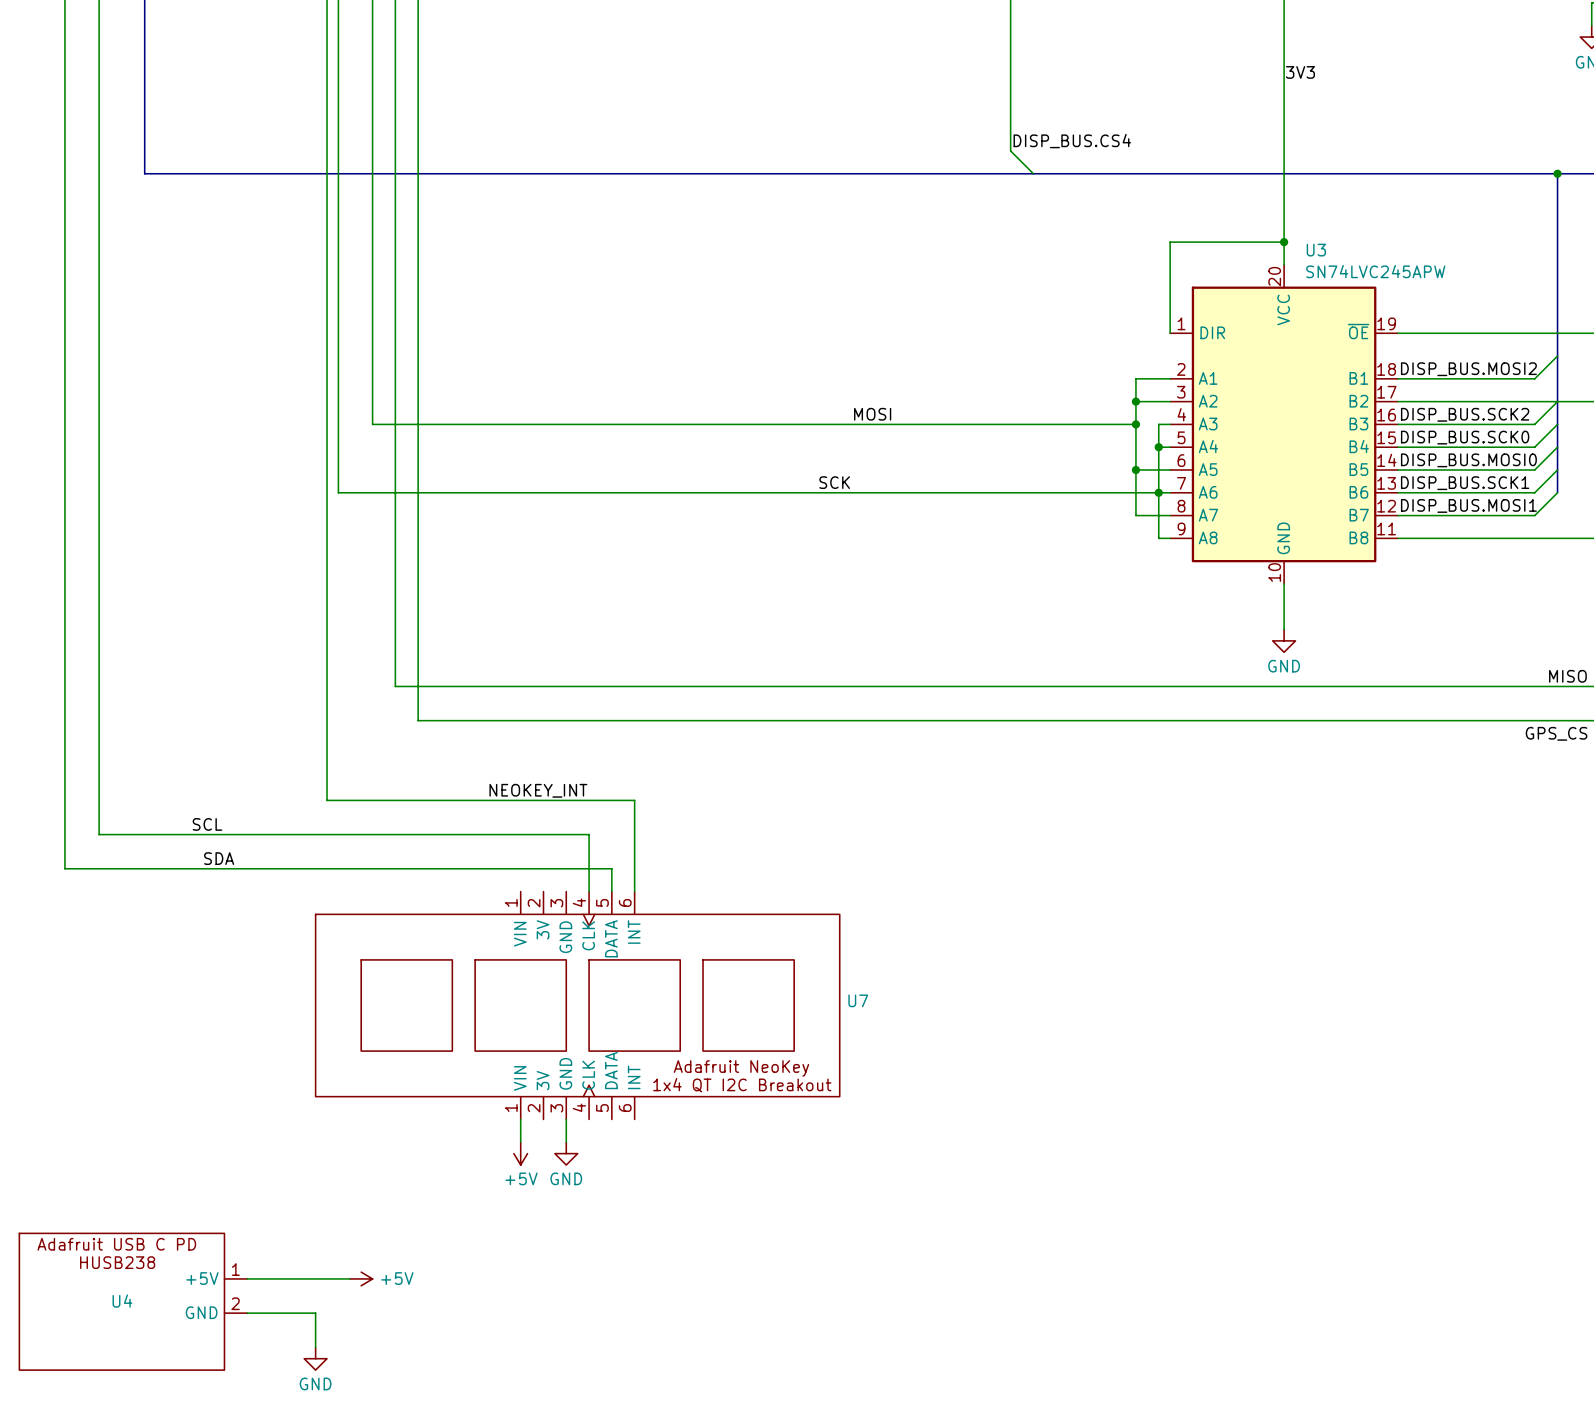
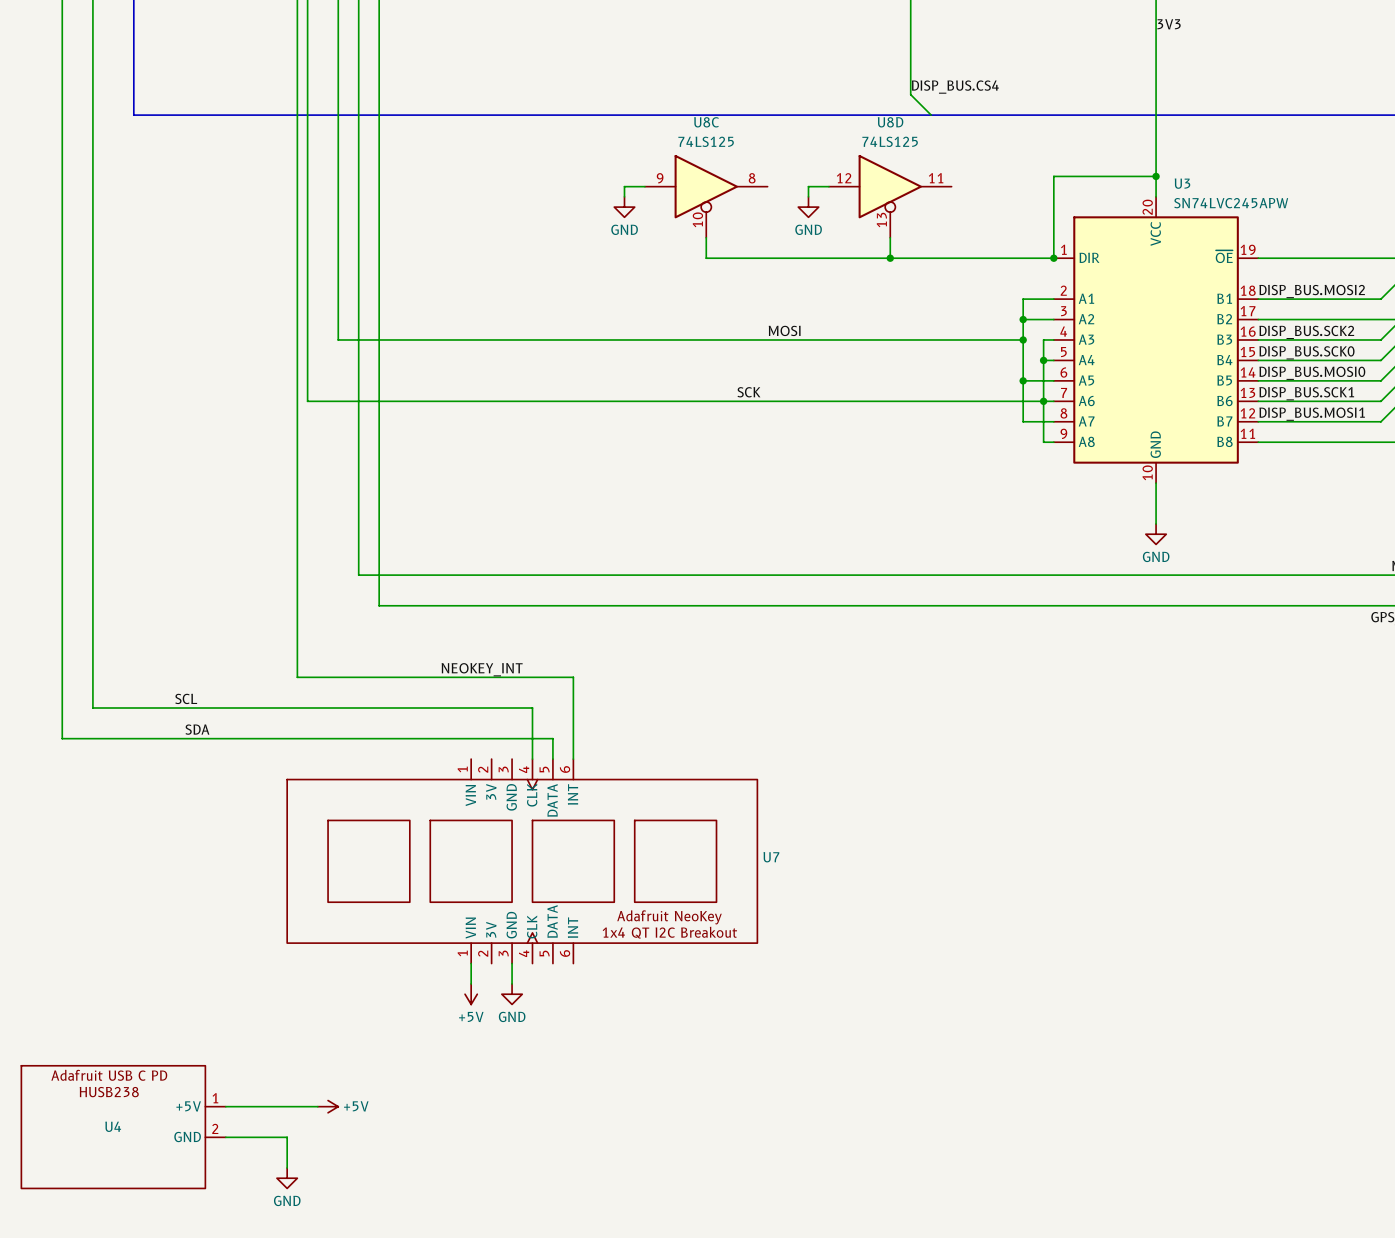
wire: none -> (644, 186) (624, 186) (624, 196)
wire: none -> (828, 186) (808, 186) (808, 196)
U8C: none -> 74LS125 (706, 196)
U8D: none -> 74LS125 (890, 196)
power symbol: none -> GND (624, 207)
power symbol: none -> GND (808, 207)
wire: none -> (706, 237) (706, 258) (1053, 258)
wire: none -> (890, 237) (890, 258)
junction: none -> (890, 258)
junction: none -> (1053, 258)

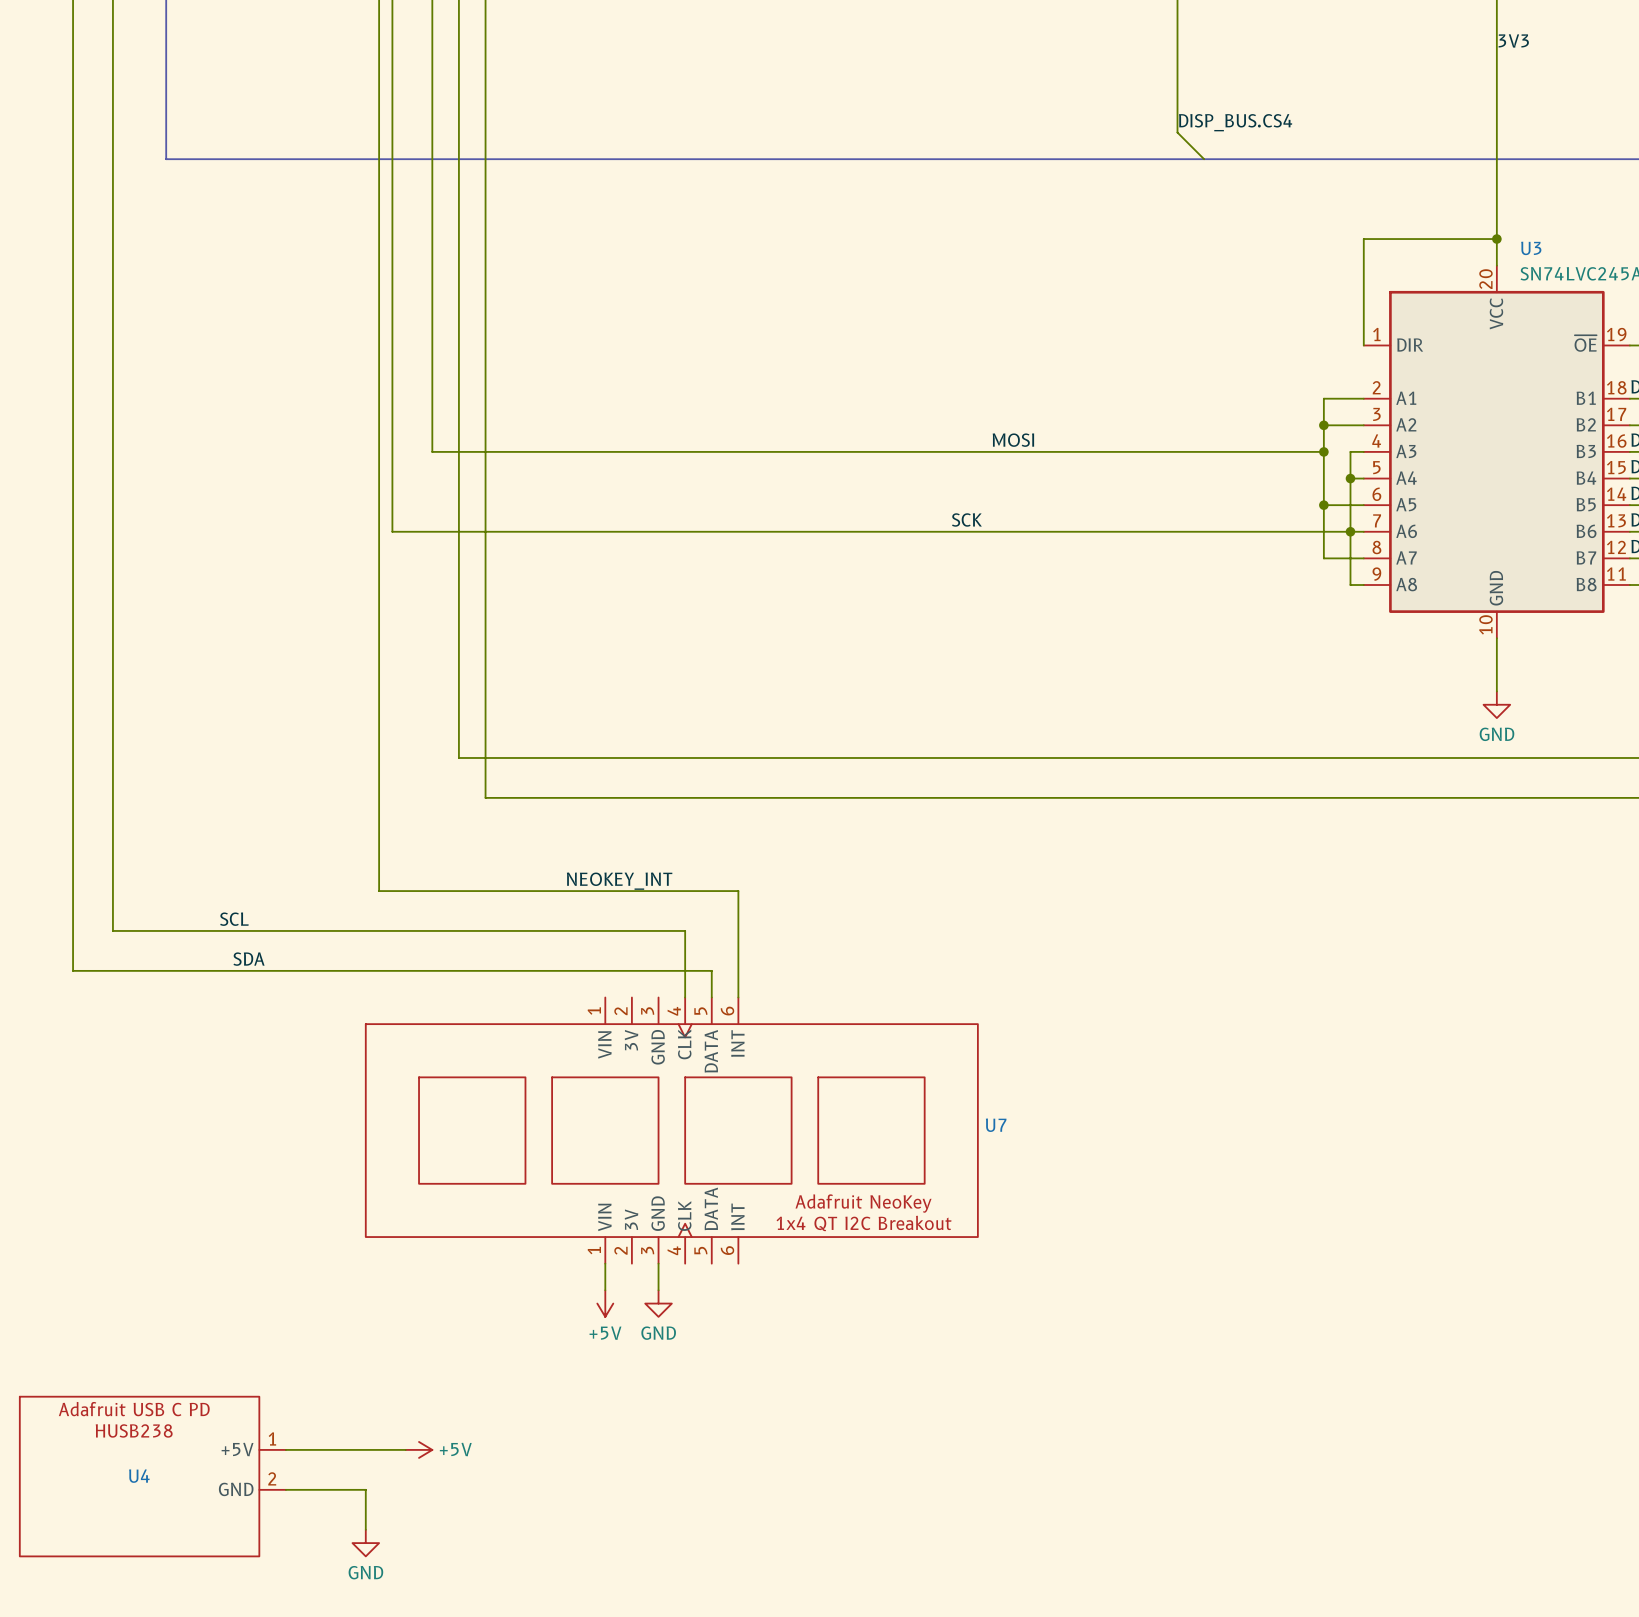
wire: (644, 186) (624, 186) (624, 196) -> none
wire: (828, 186) (808, 186) (808, 196) -> none
U8C: 74LS125 (706, 196) -> none
U8D: 74LS125 (890, 196) -> none
power symbol: GND (624, 207) -> none
power symbol: GND (808, 207) -> none
wire: (706, 237) (706, 258) (1053, 258) -> none
wire: (890, 237) (890, 258) -> none
junction: (890, 258) -> none
junction: (1053, 258) -> none

